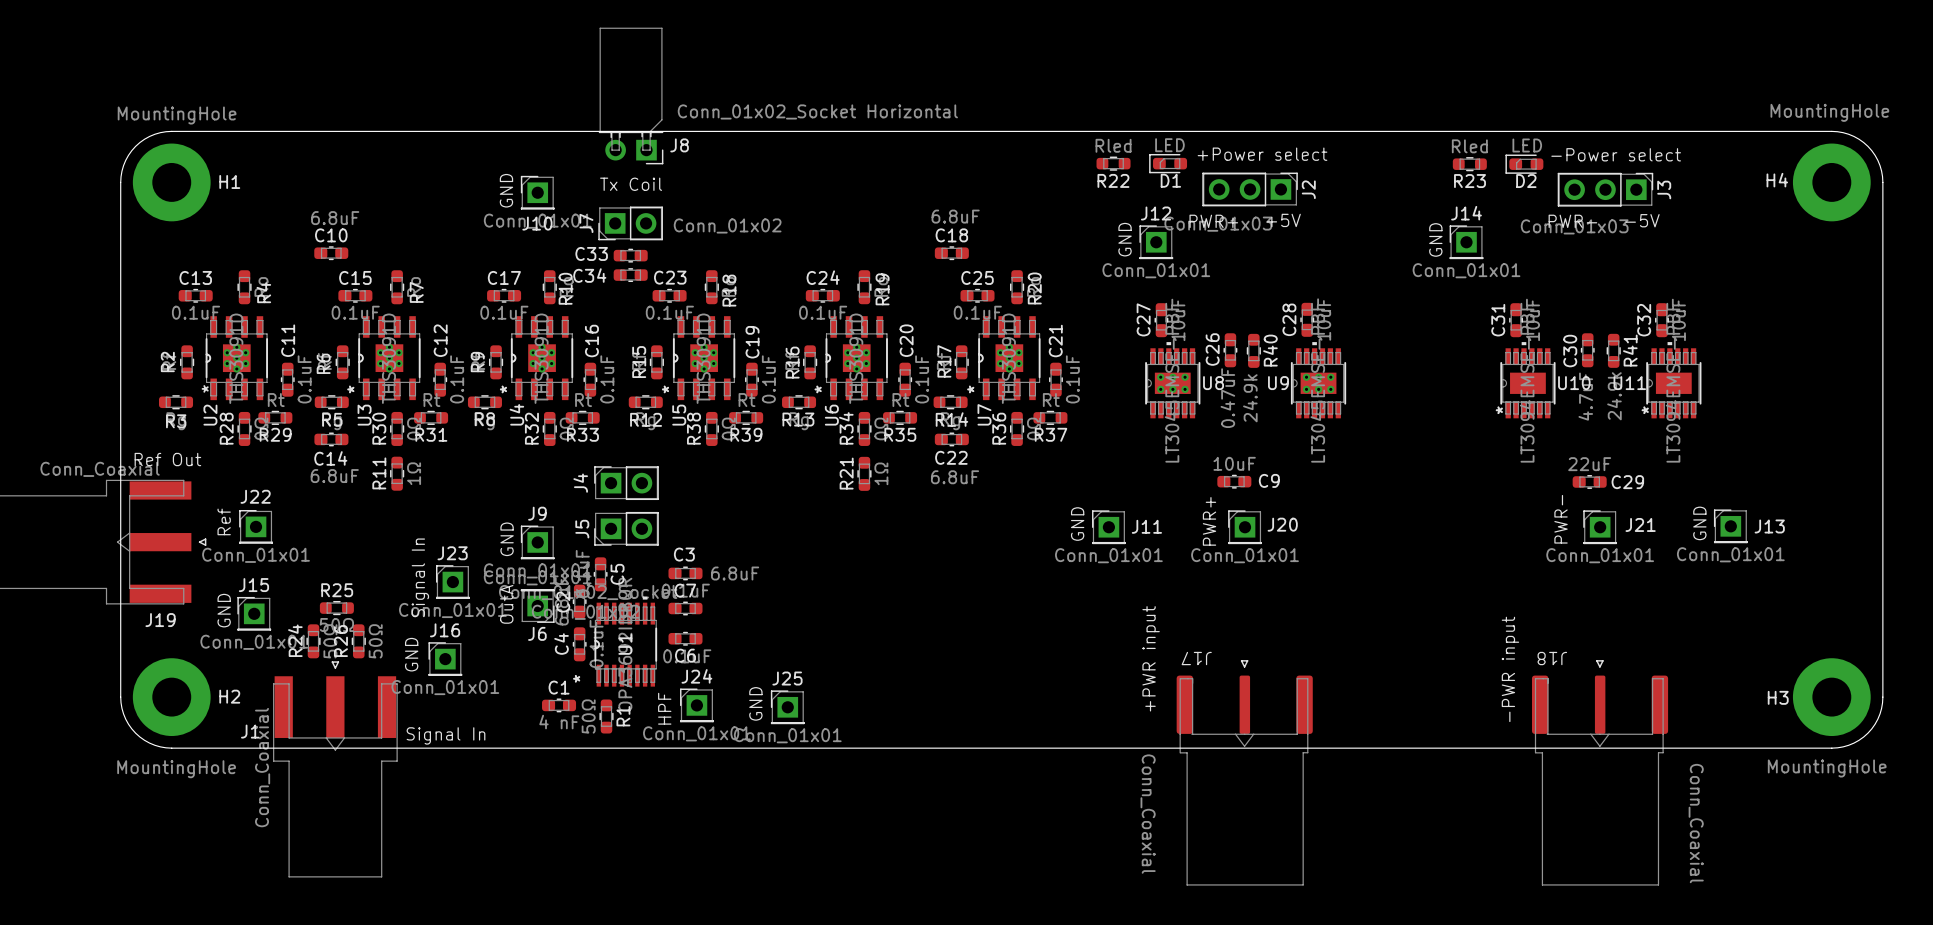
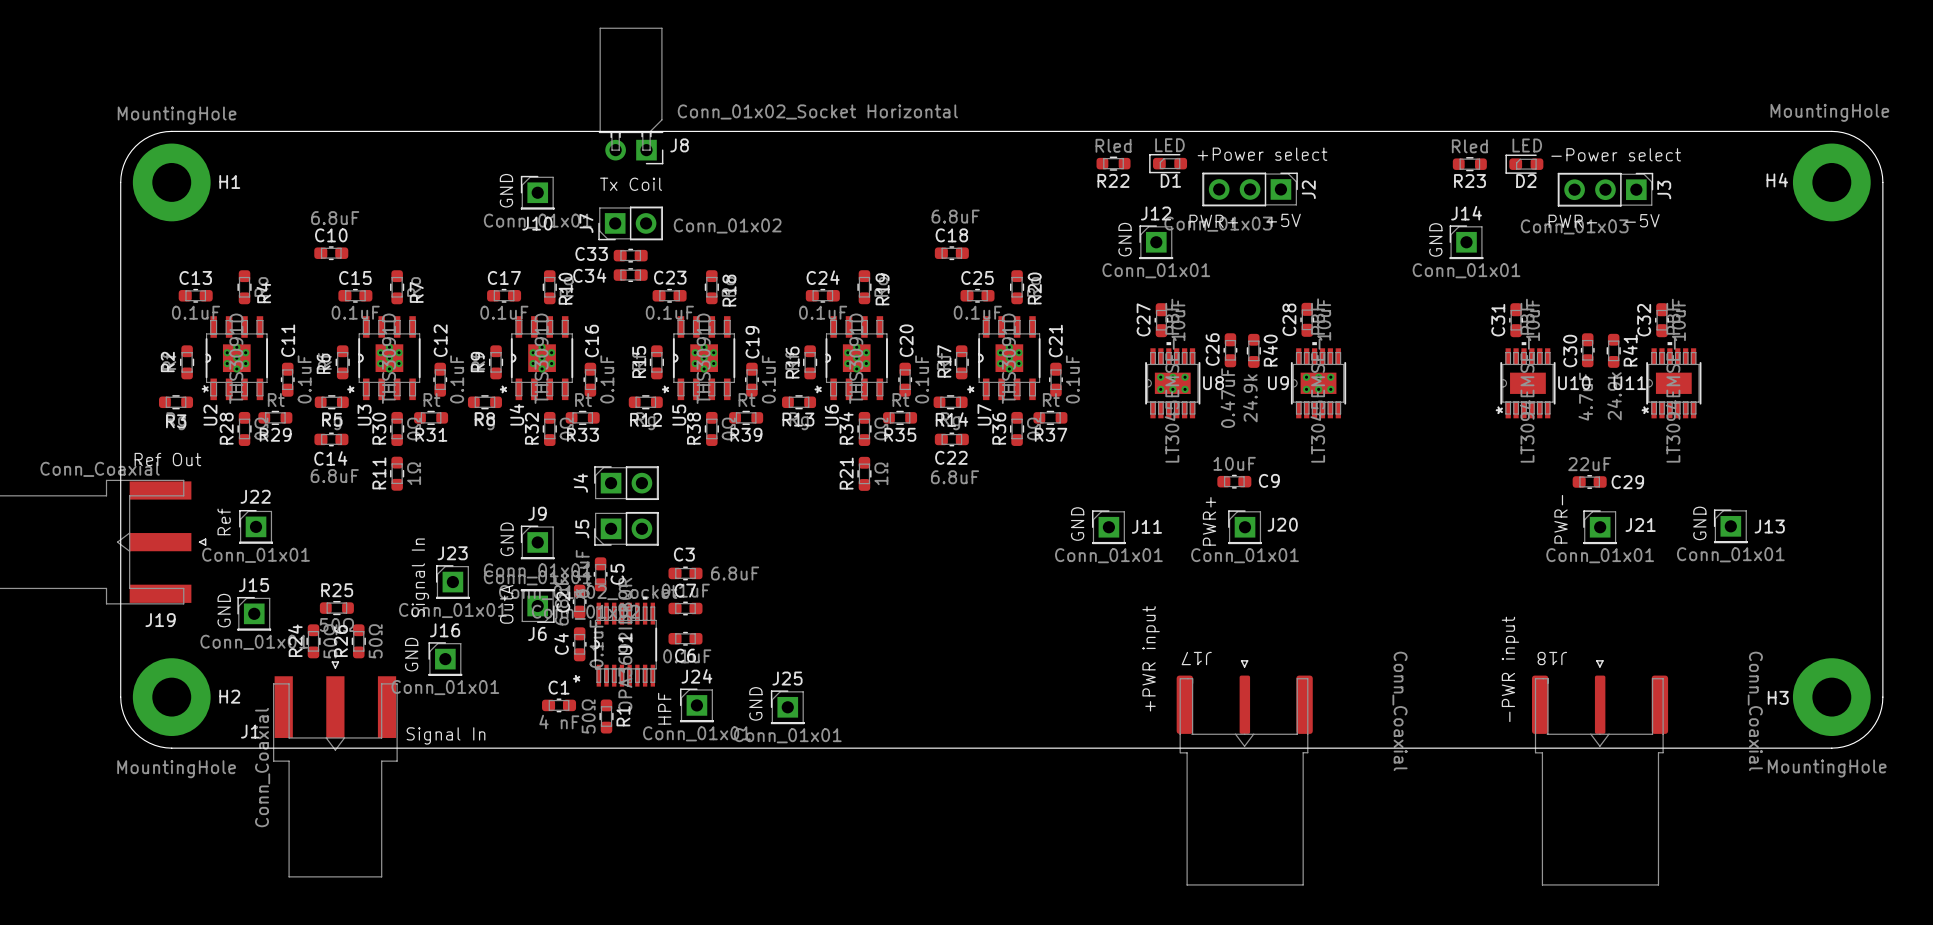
J17 value position: Conn_Coaxial (1148, 814) -> Conn_Coaxial (1400, 711)
J18 value position: Conn_Coaxial (1696, 823) -> Conn_Coaxial (1755, 711)

